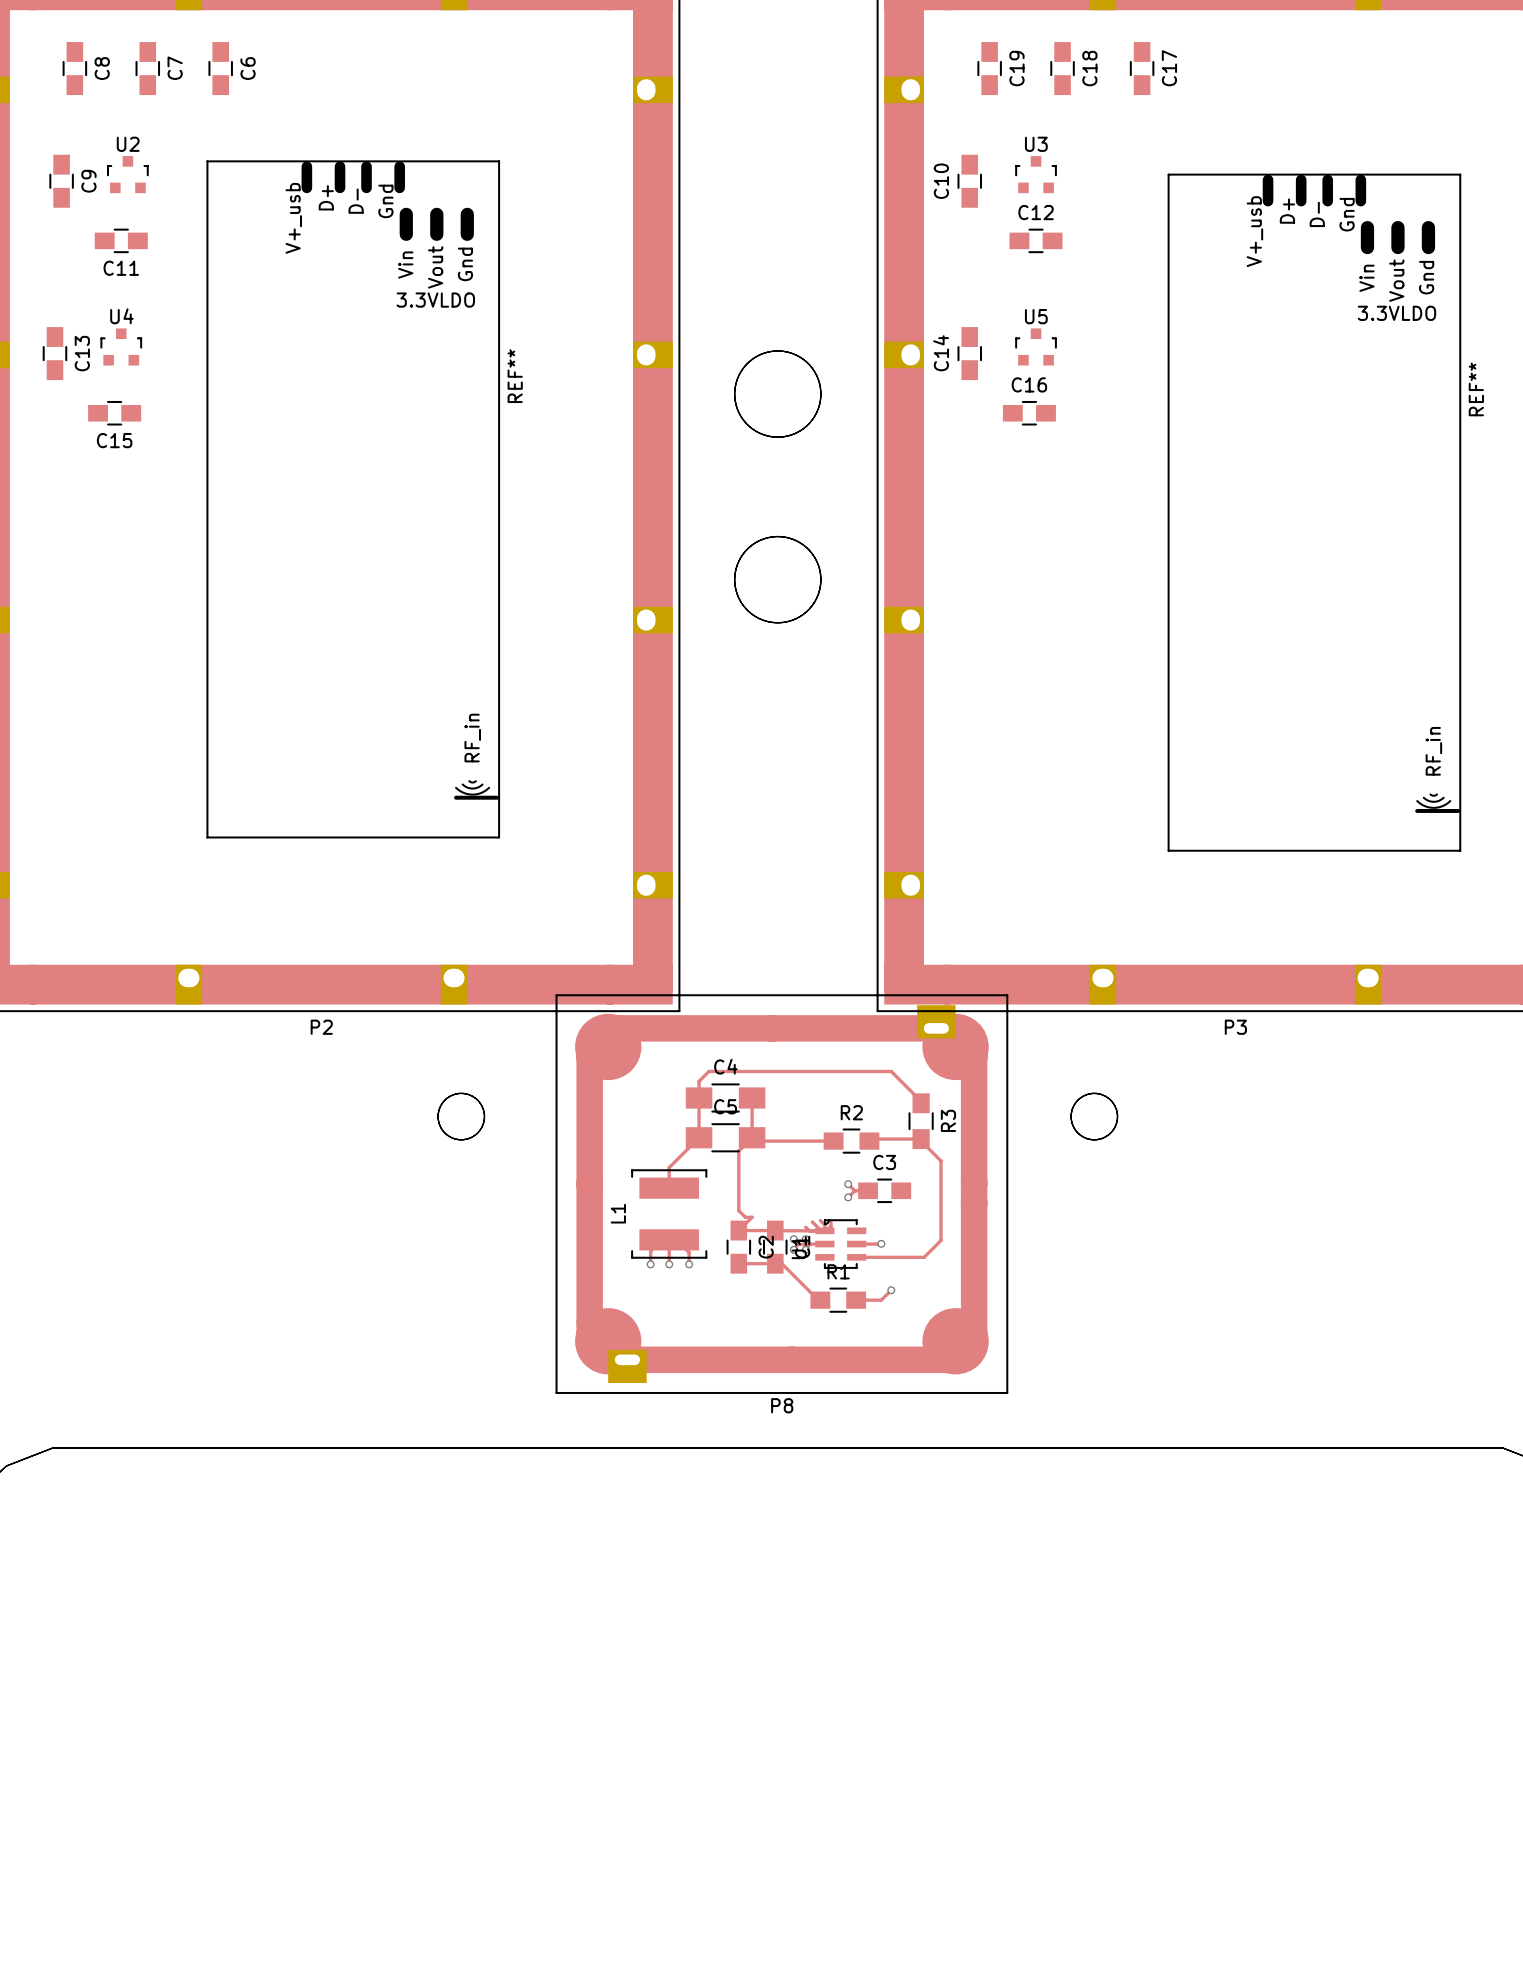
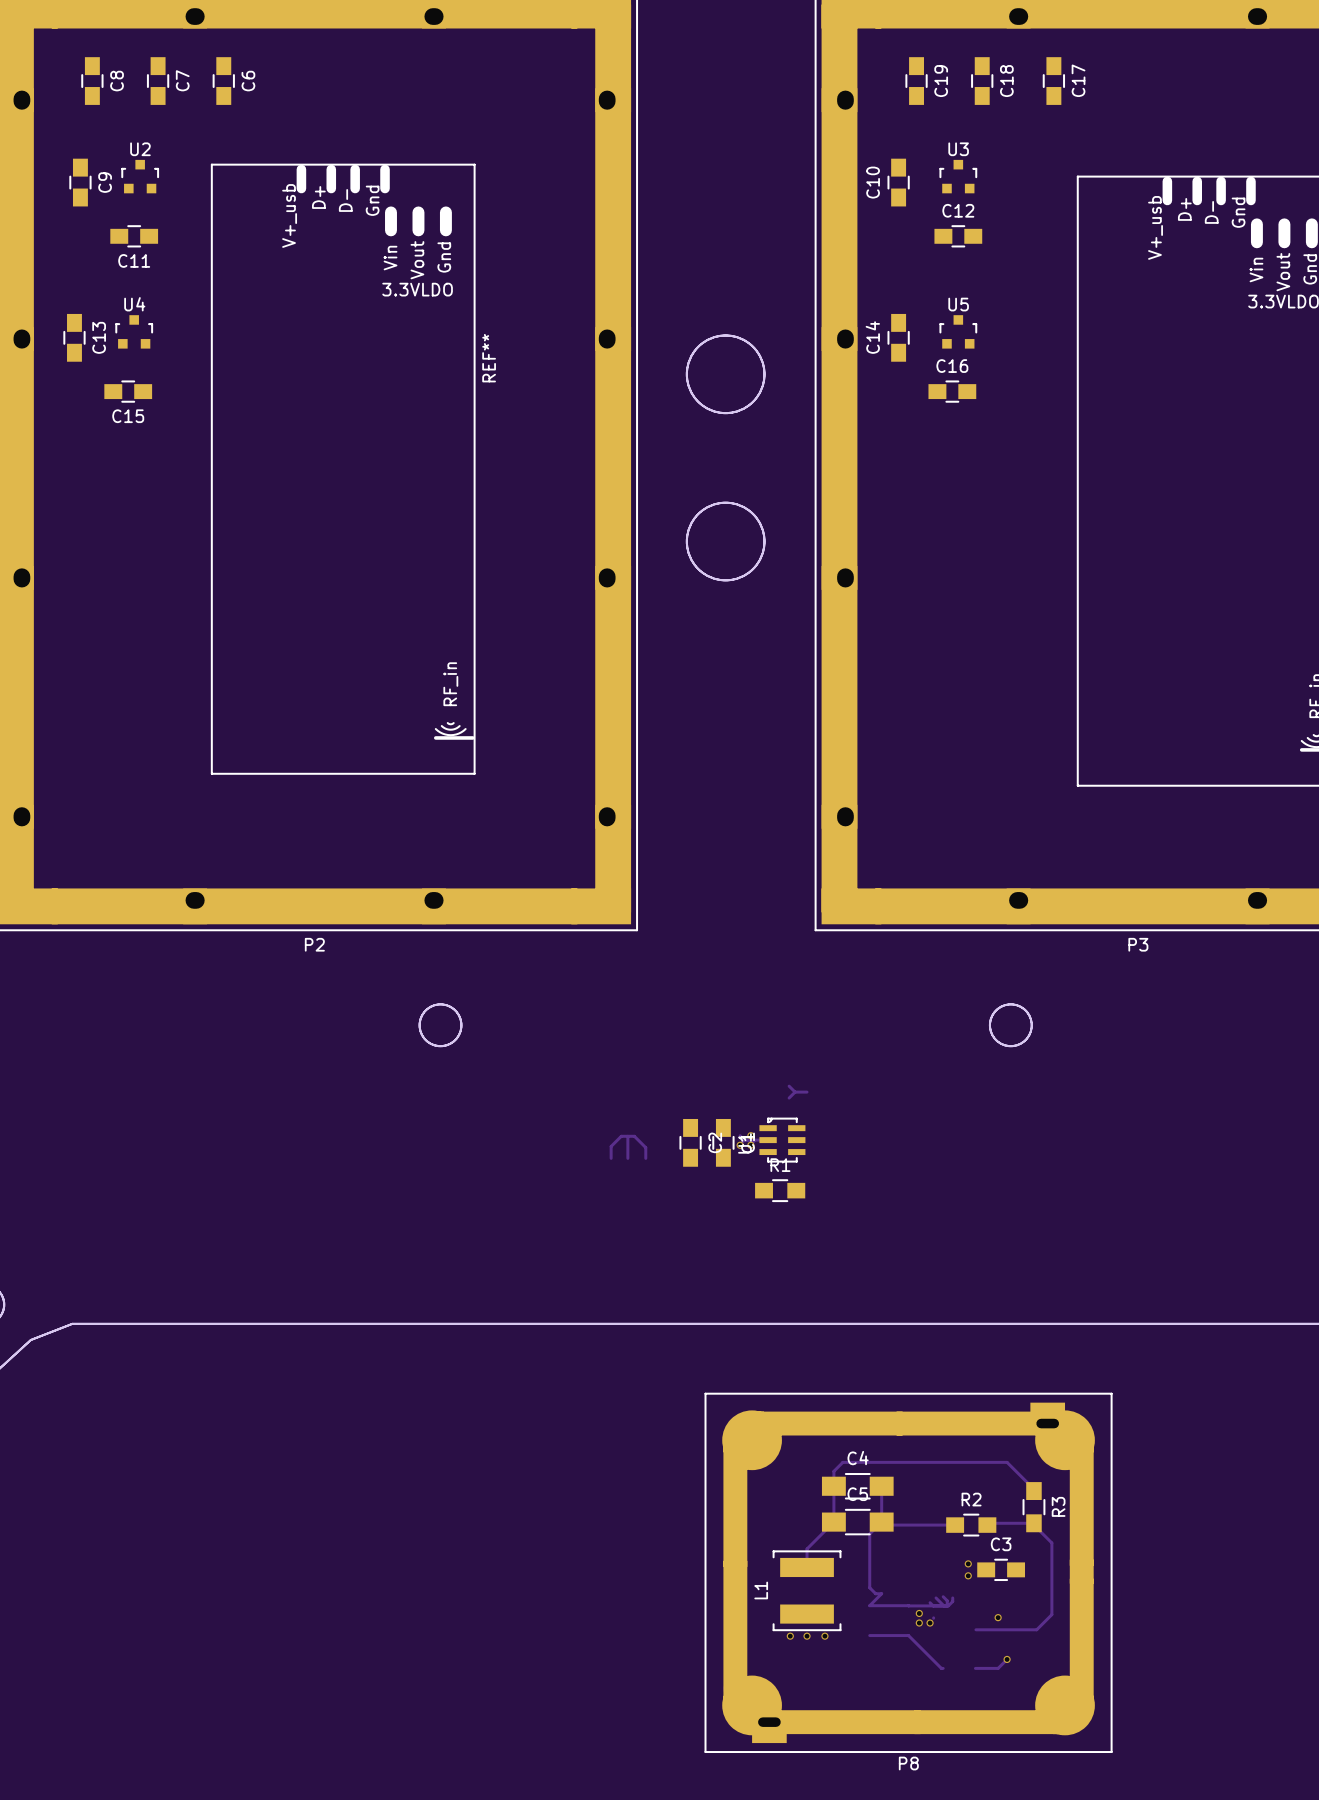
C4 position: (725, 1097) -> (857, 1486)
track: (752, 1097) (752, 1137) -> none
track: (921, 1103) (891, 1071) (708, 1071) (699, 1081) (699, 1137) (669, 1167) (669, 1188) -> none
R3 position: (921, 1121) -> (1033, 1507)
C5 position: (725, 1137) -> (857, 1522)
track: (752, 1137) (755, 1141) (833, 1141) -> none
track: (752, 1137) (738, 1151) (738, 1210) (745, 1217) (752, 1217) (738, 1230) (826, 1230) (830, 1225) (830, 1221) -> none
R2 position: (851, 1141) -> (971, 1525)
track: (869, 1141) (871, 1139) (921, 1139) (941, 1160) (941, 1240) (924, 1257) (856, 1257) -> none
via: (848, 1184) -> none
C3 position: (884, 1190) -> (1001, 1569)
P8 position: (781, 1194) -> (908, 1572)
via: (848, 1197) -> none
L1 position: (669, 1213) -> (807, 1590)
track: (820, 1220) (824, 1225) (824, 1230) -> none
track: (812, 1221) (821, 1230) -> none
track: (805, 1227) (809, 1230) -> none
via: (793, 1239) -> none
track: (881, 1243) (856, 1244) -> none
via: (881, 1243) -> none
track: (738, 1263) (781, 1263) (820, 1300) -> none
via: (650, 1264) -> none
via: (669, 1264) -> none
via: (689, 1264) -> none
track: (891, 1290) (881, 1300) (856, 1300) -> none
via: (891, 1290) -> none
track: none -> (881, 1486) (881, 1522)
track: none -> (1033, 1491) (1007, 1462) (842, 1462) (833, 1471) (833, 1522) (807, 1548) (807, 1567)
track: none -> (881, 1522) (884, 1525) (955, 1525)
track: none -> (881, 1522) (869, 1534) (869, 1587) (875, 1593) (881, 1593) (869, 1605) (948, 1605) (952, 1601) (952, 1597)
track: none -> (987, 1525) (989, 1523) (1033, 1523) (1051, 1542) (1051, 1614) (1036, 1629) (975, 1629)
via: none -> (968, 1563)
via: none -> (968, 1575)
track: none -> (943, 1596) (947, 1600) (947, 1605)
track: none -> (936, 1597) (944, 1605)
track: none -> (930, 1602) (933, 1605)
via: none -> (919, 1613)
track: none -> (933, 1617) (933, 1618)
via: none -> (998, 1617)
via: none -> (919, 1623)
via: none -> (930, 1623)
via: none -> (790, 1636)
via: none -> (807, 1636)
via: none -> (824, 1636)
track: none -> (869, 1635) (908, 1635) (943, 1668)
track: none -> (1007, 1659) (998, 1668) (975, 1668)
via: none -> (1007, 1659)

